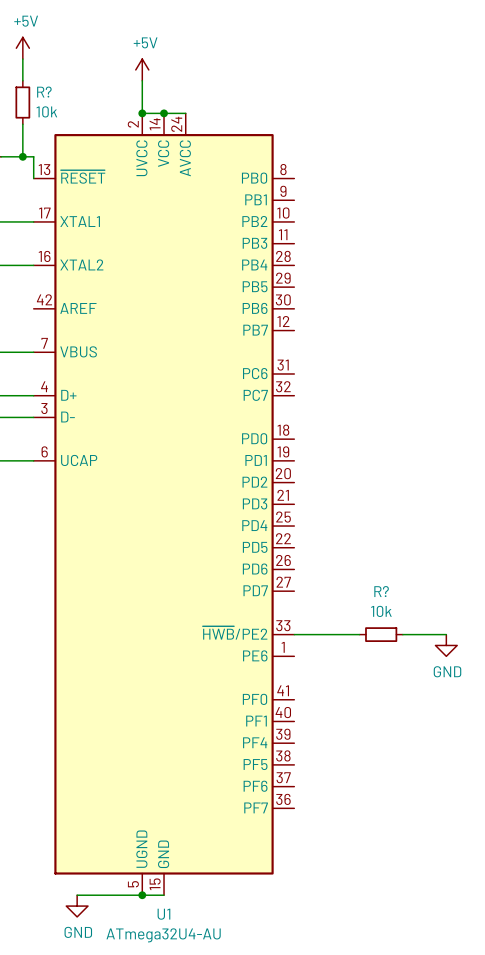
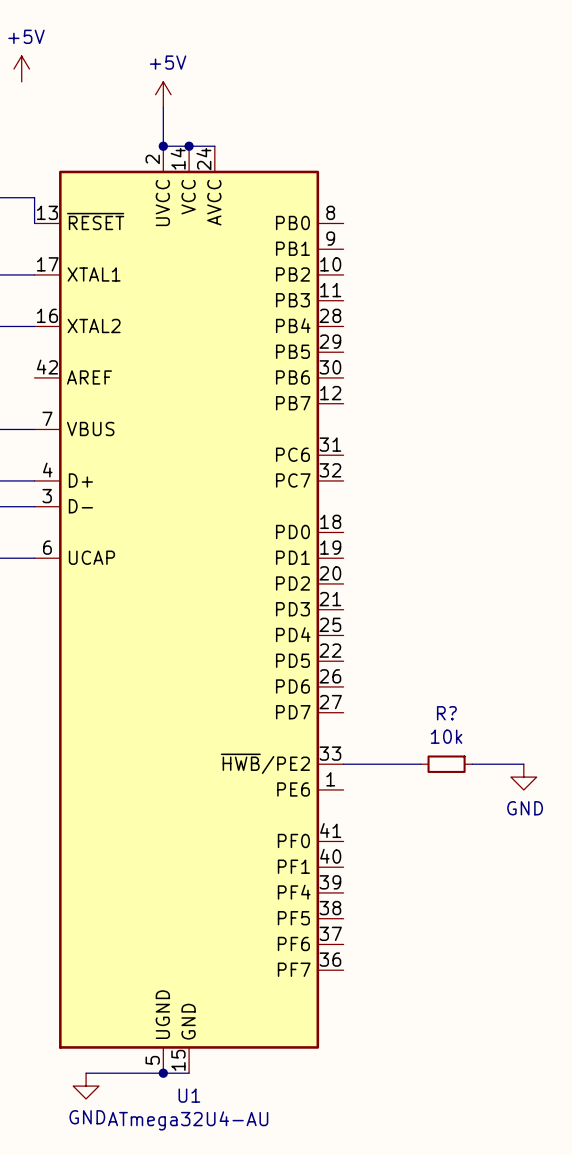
wire: (22, 59) (22, 80) -> none
R?: 10k (22, 102) -> none
wire: (22, 124) (22, 156) -> none
junction: (22, 156) -> none

